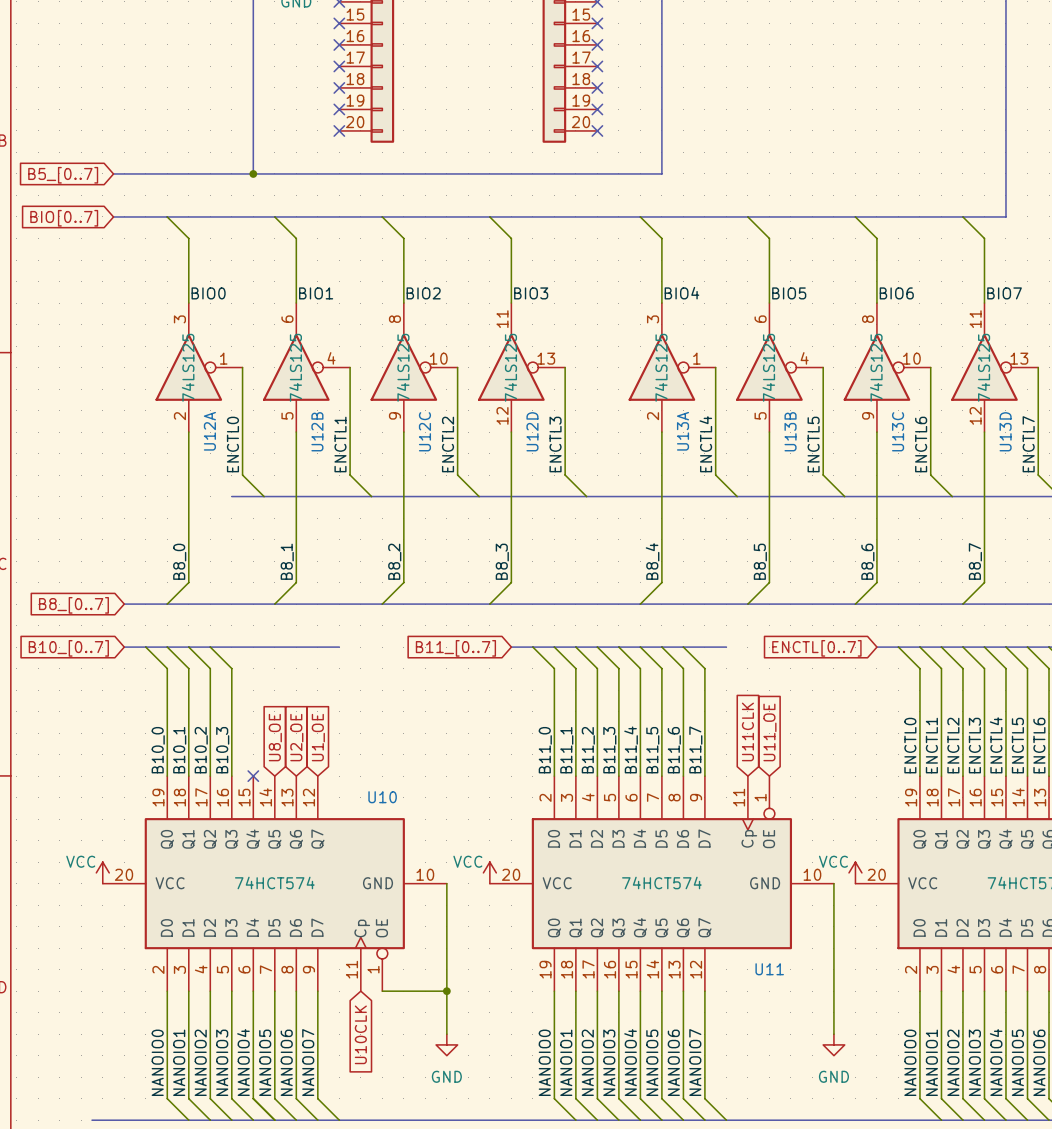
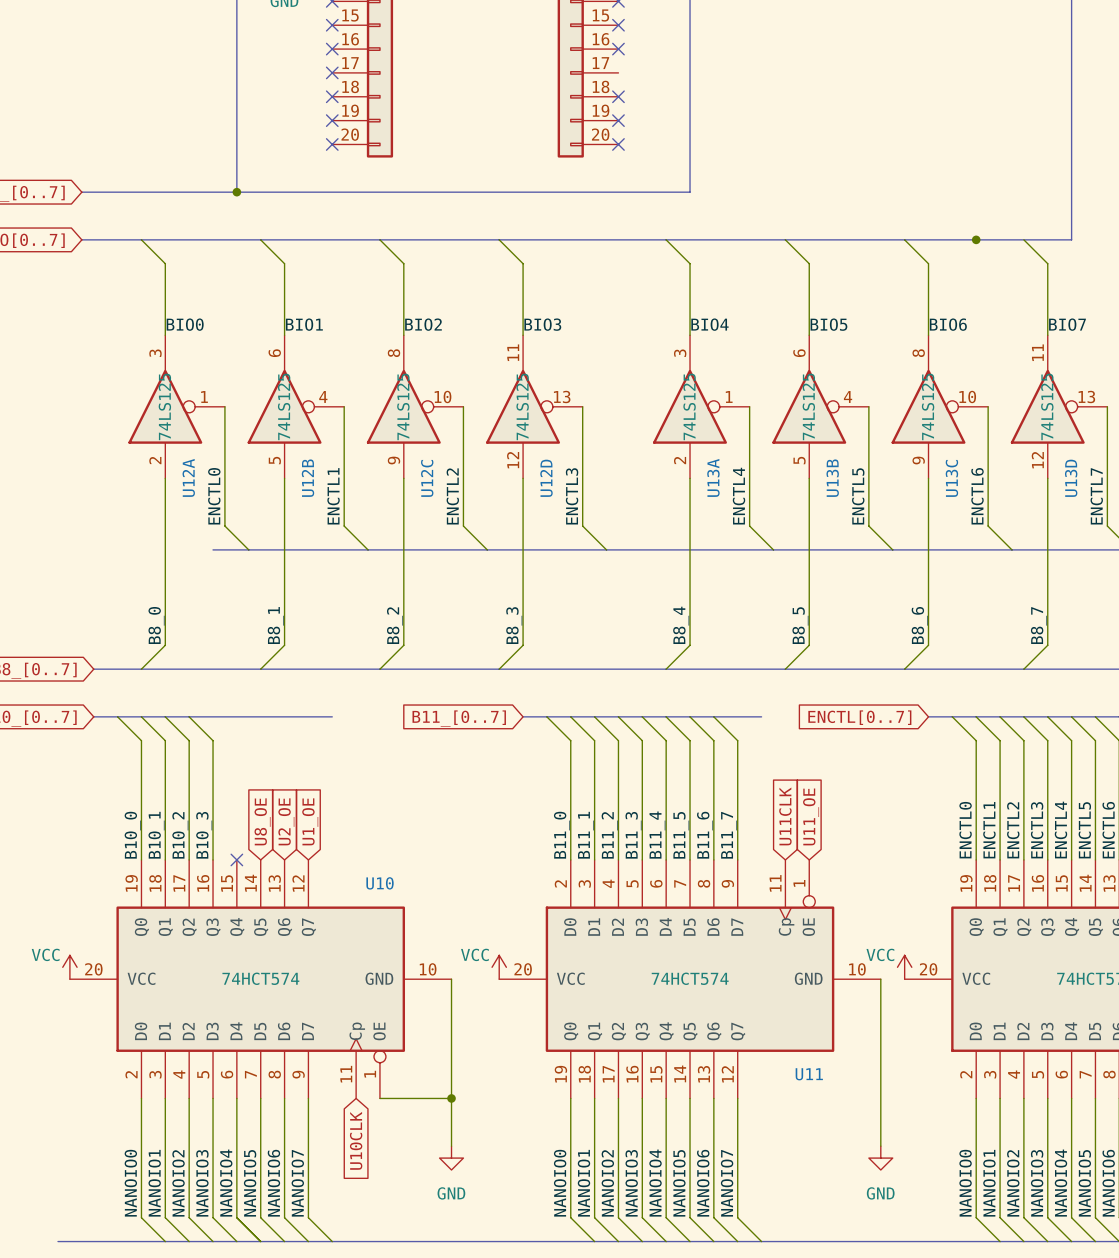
no-connect mark: (597, 66) -> none
junction: none -> (976, 239)

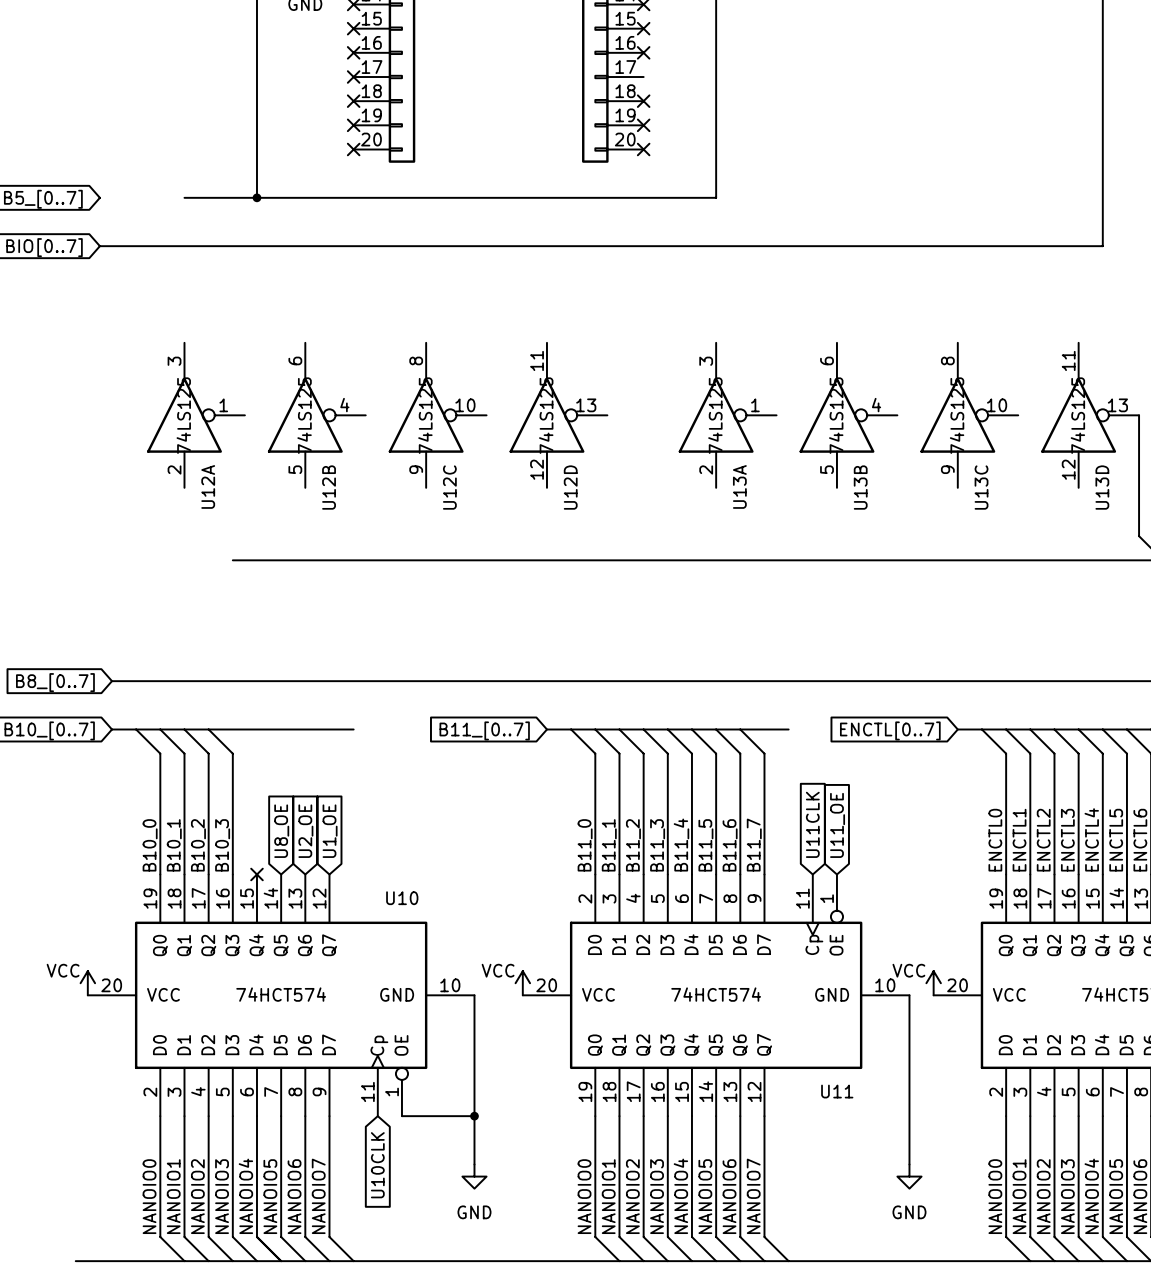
bus: (81, 192) (165, 192) -> none
wire: (141, 239) (165, 263) (165, 335) -> none
wire: (260, 239) (284, 263) (284, 335) -> none
wire: (379, 239) (403, 263) (403, 335) -> none
wire: (499, 239) (523, 263) (523, 335) -> none
wire: (666, 239) (690, 263) (690, 335) -> none
wire: (785, 239) (809, 263) (809, 335) -> none
wire: (904, 239) (928, 263) (928, 335) -> none
junction: (976, 239) -> none
wire: (1023, 239) (1047, 263) (1047, 335) -> none
label: BIO0 (185, 324) -> none
label: BIO1 (304, 324) -> none
label: BIO2 (423, 324) -> none
label: BIO3 (542, 324) -> none
label: BIO4 (709, 324) -> none
label: BIO5 (828, 324) -> none
label: BIO6 (948, 324) -> none
label: BIO7 (1067, 324) -> none
wire: (224, 406) (224, 526) (248, 549) -> none
wire: (344, 406) (344, 526) (368, 549) -> none
wire: (463, 406) (463, 526) (487, 549) -> none
wire: (582, 406) (582, 526) (606, 549) -> none
wire: (749, 406) (749, 526) (773, 549) -> none
wire: (868, 406) (868, 526) (892, 549) -> none
wire: (988, 406) (988, 526) (1011, 549) -> none
wire: (165, 478) (165, 645) (141, 669) -> none
wire: (284, 478) (284, 645) (260, 669) -> none
wire: (403, 478) (403, 645) (379, 669) -> none
wire: (523, 478) (523, 645) (499, 669) -> none
wire: (690, 478) (690, 645) (666, 669) -> none
wire: (809, 478) (809, 645) (785, 669) -> none
wire: (928, 478) (928, 645) (904, 669) -> none
wire: (1047, 478) (1047, 645) (1023, 669) -> none
label: ENCTL0 (214, 496) -> none
label: ENCTL1 (333, 496) -> none
label: ENCTL2 (452, 496) -> none
label: ENCTL3 (572, 496) -> none
label: ENCTL4 (739, 496) -> none
label: ENCTL5 (858, 496) -> none
label: ENCTL6 (977, 496) -> none
label: ENCTL7 (1096, 496) -> none
label: B8_0 (156, 625) -> none
label: B8_1 (275, 625) -> none
label: B8_2 (394, 625) -> none
label: B8_3 (514, 625) -> none
label: B8_4 (681, 625) -> none
label: B8_5 (800, 625) -> none
label: B8_6 (919, 625) -> none
label: B8_7 (1038, 625) -> none

